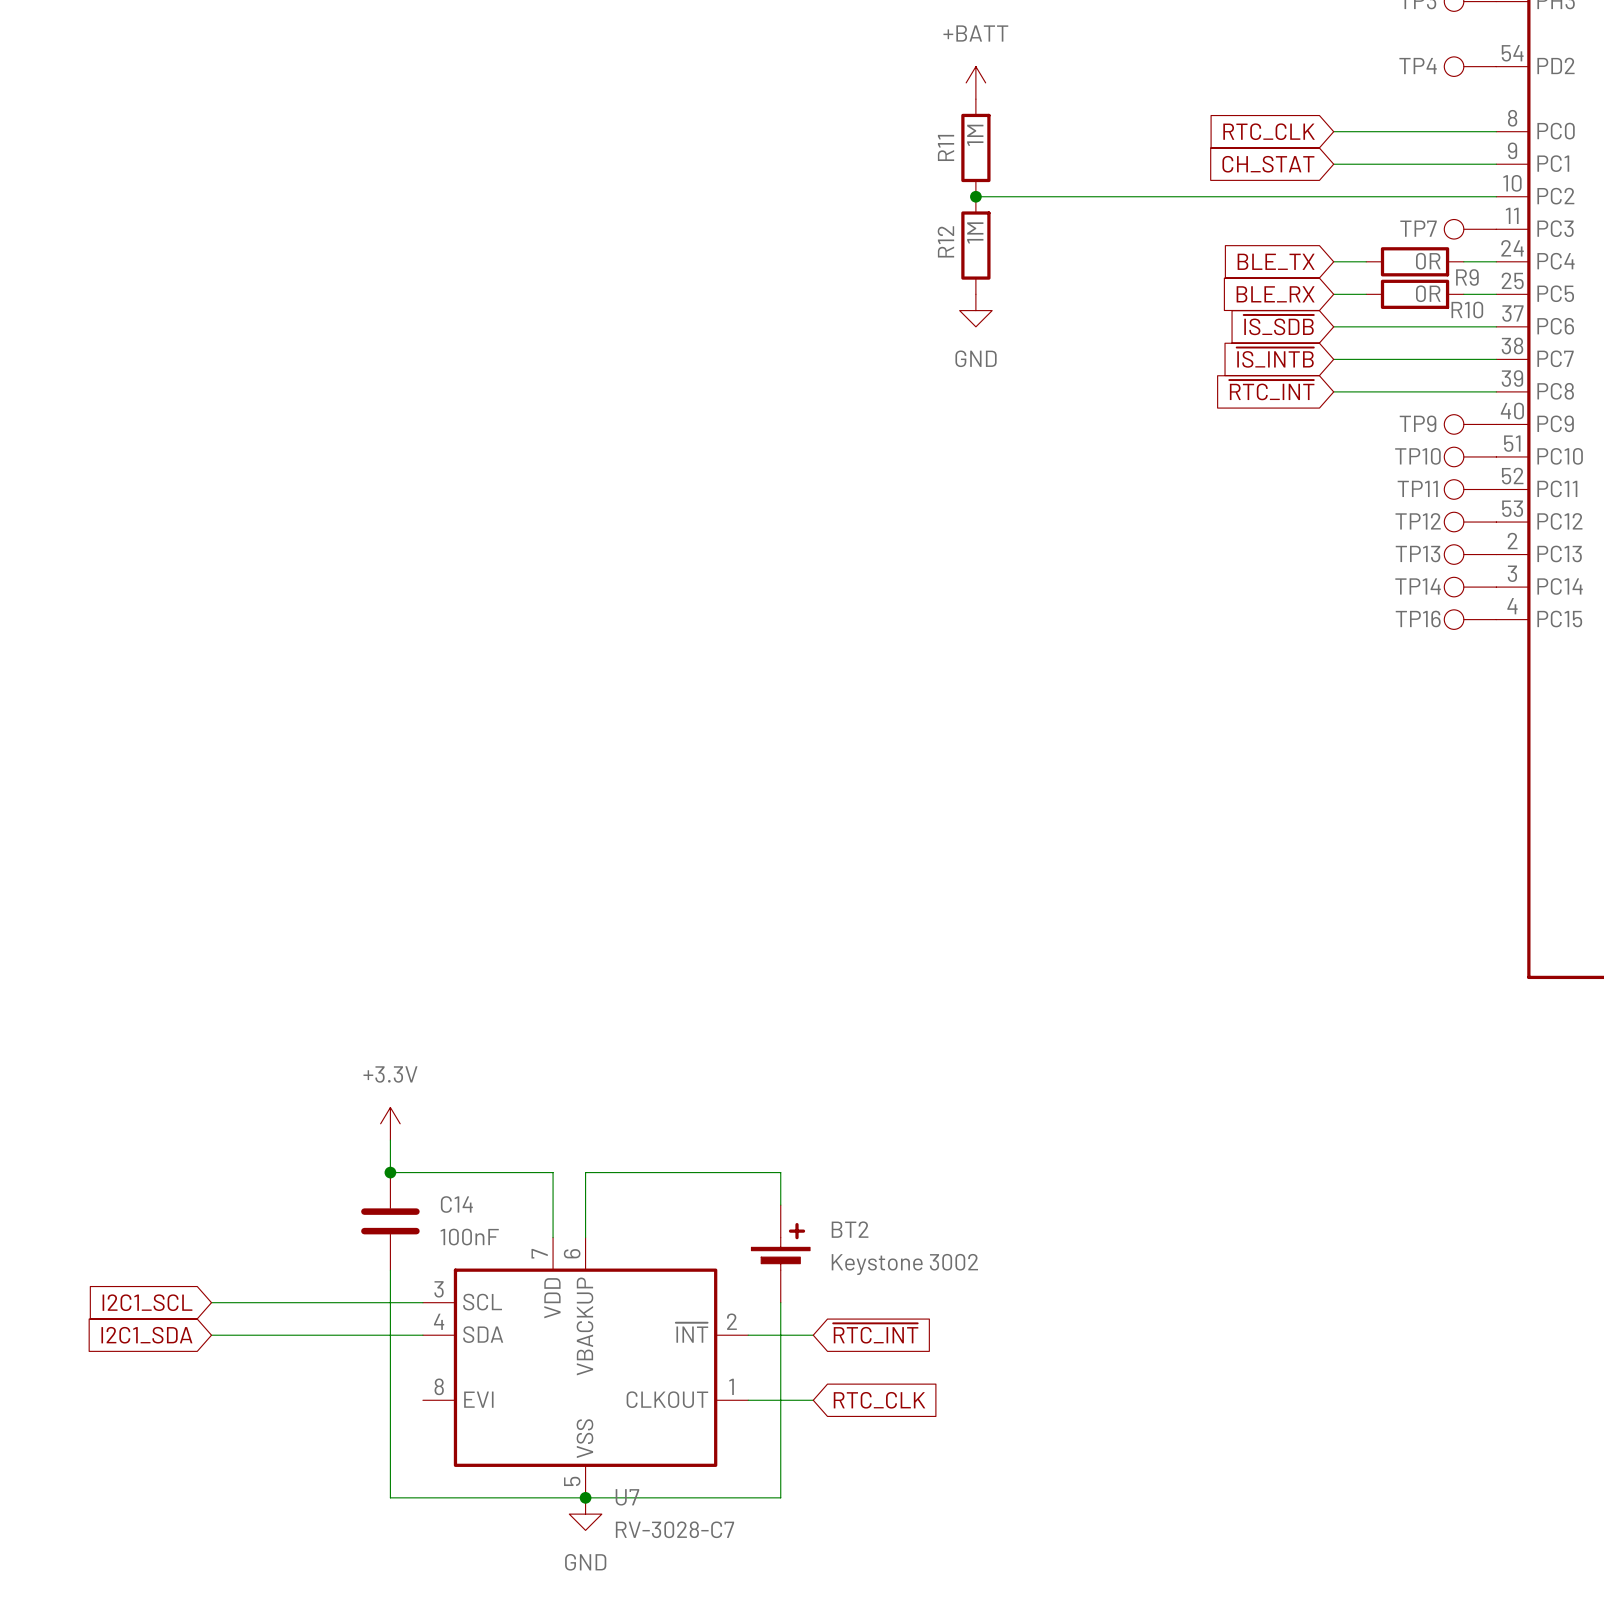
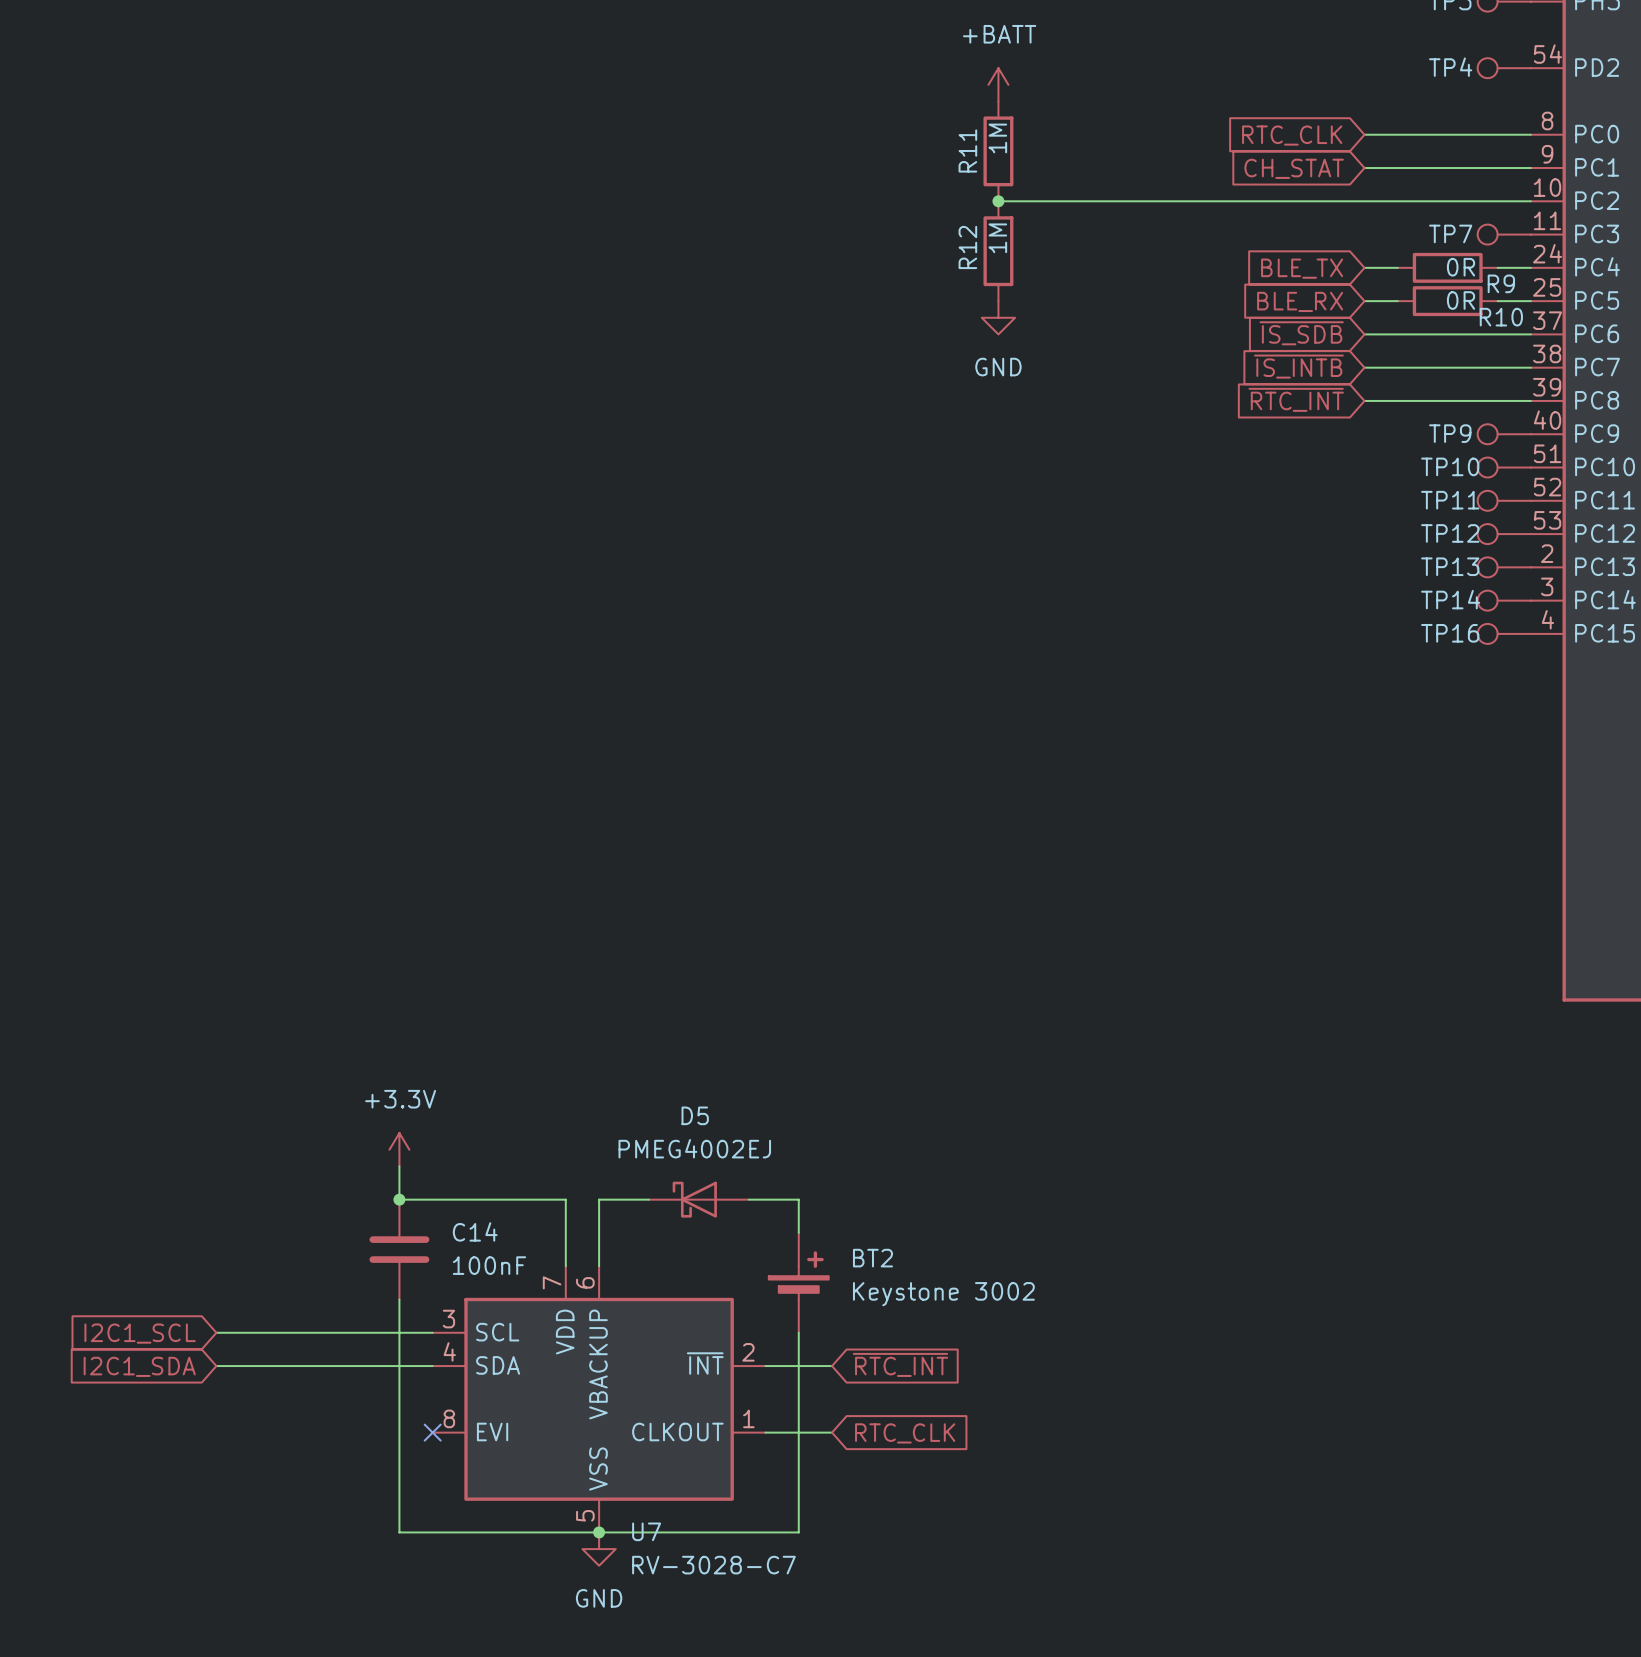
D5: none -> PMEG4002EJ (698, 1199)
no-connect mark: none -> (432, 1432)

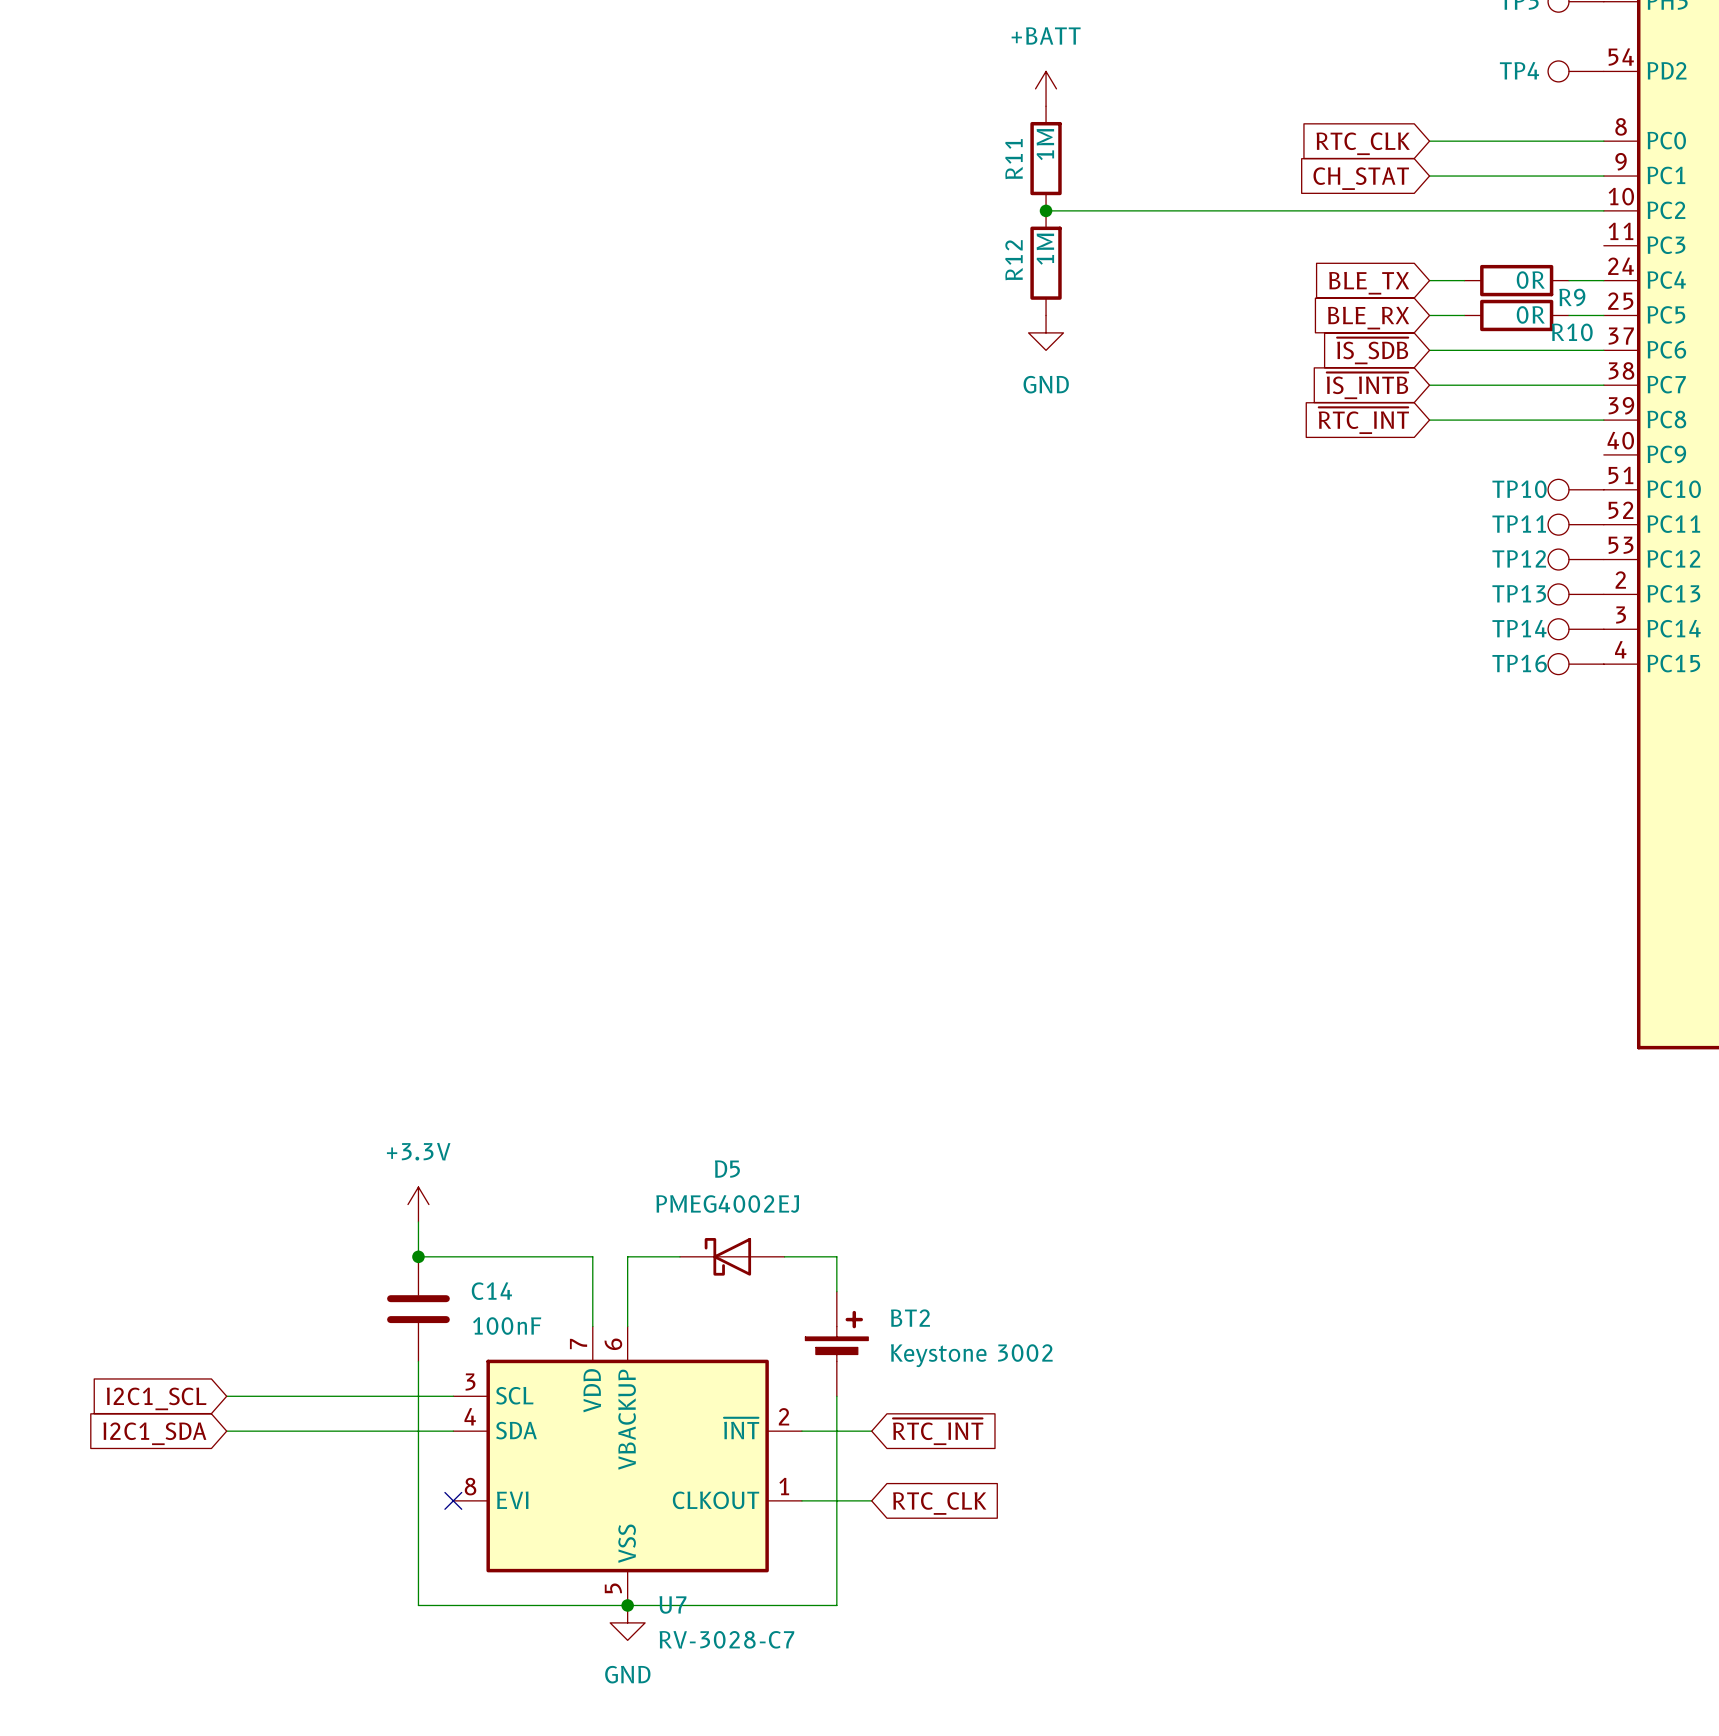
TP7: (1504, 234) -> none
TP9: (1504, 434) -> none

